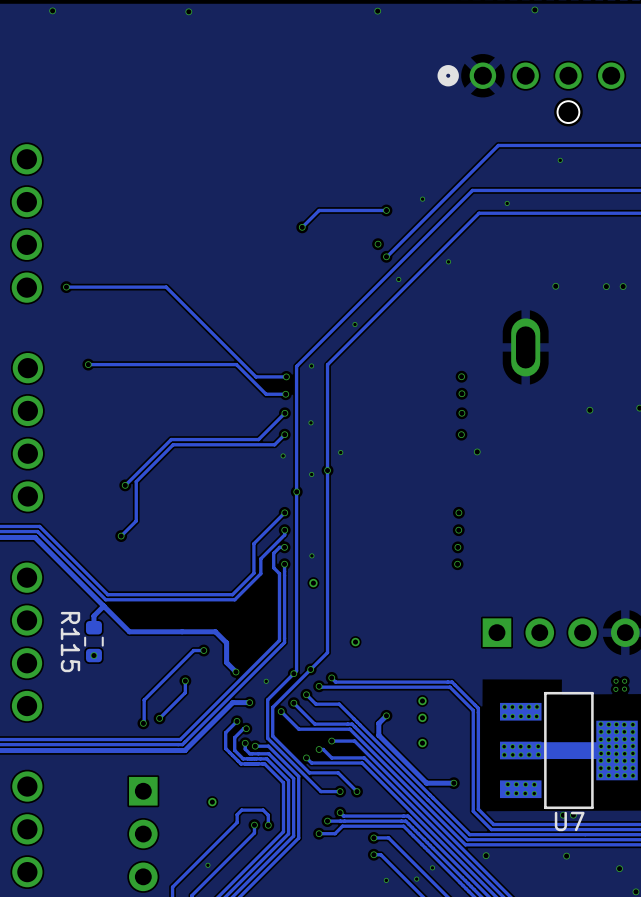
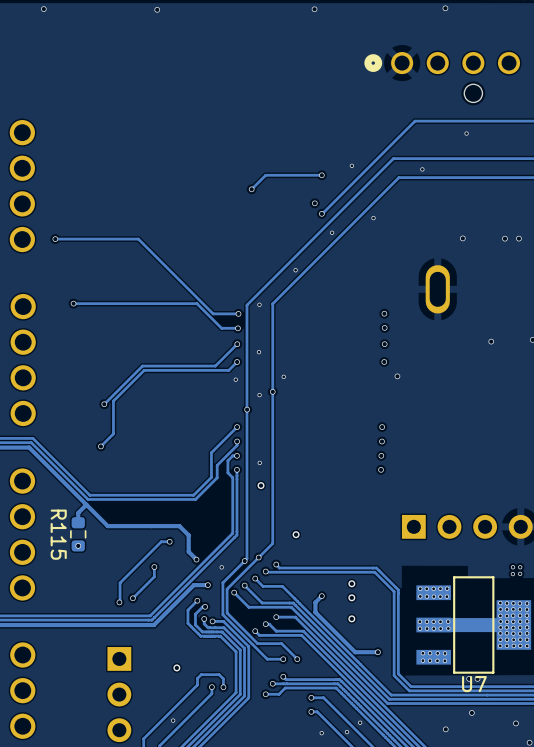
via position: (486, 855) -> (445, 729)

